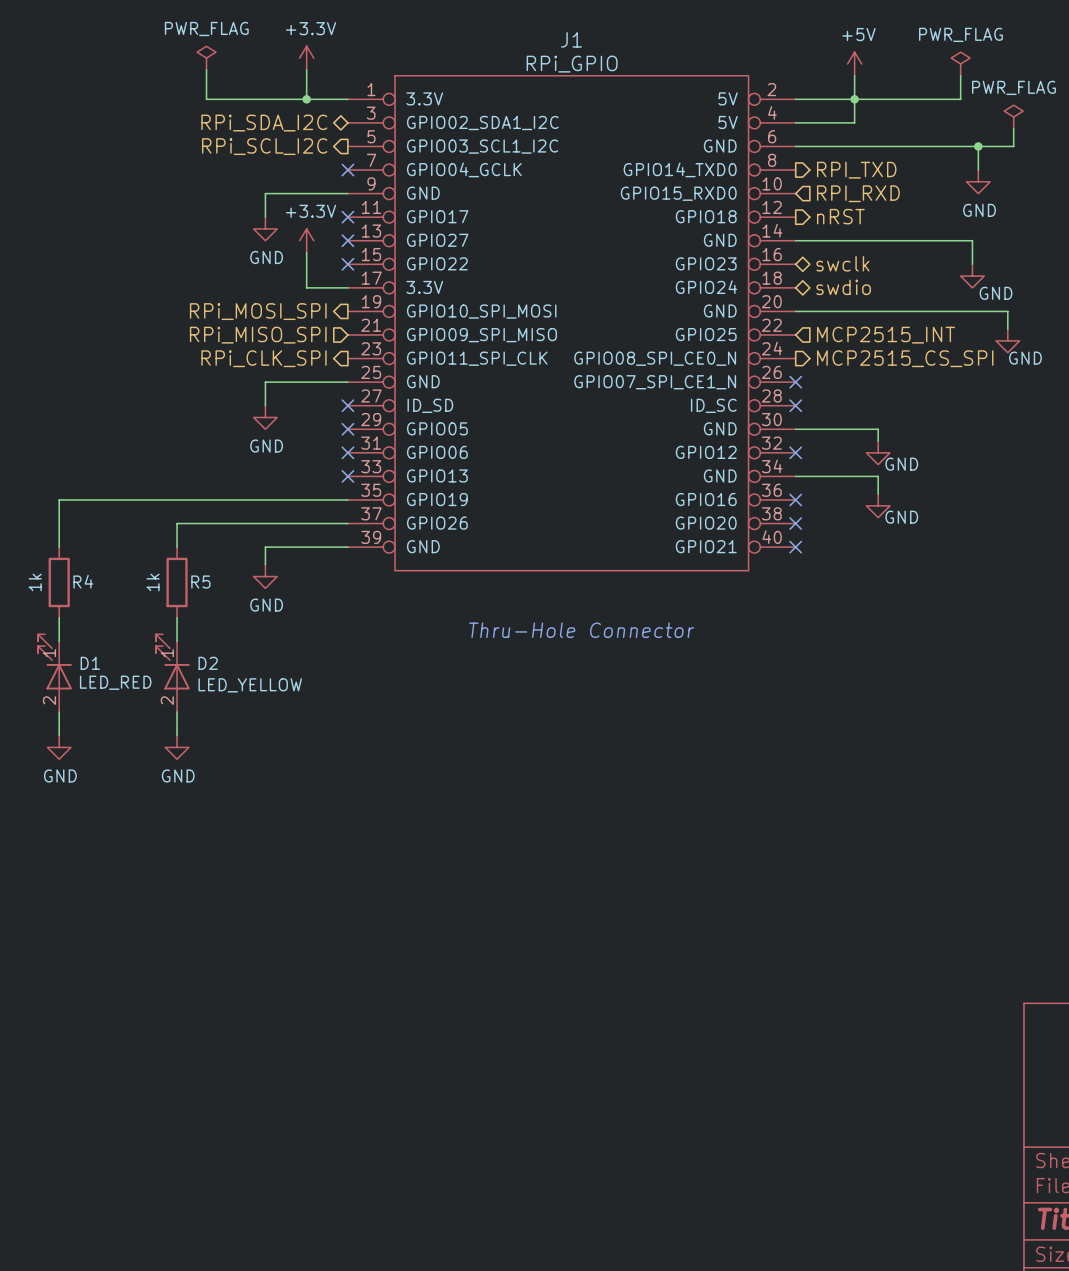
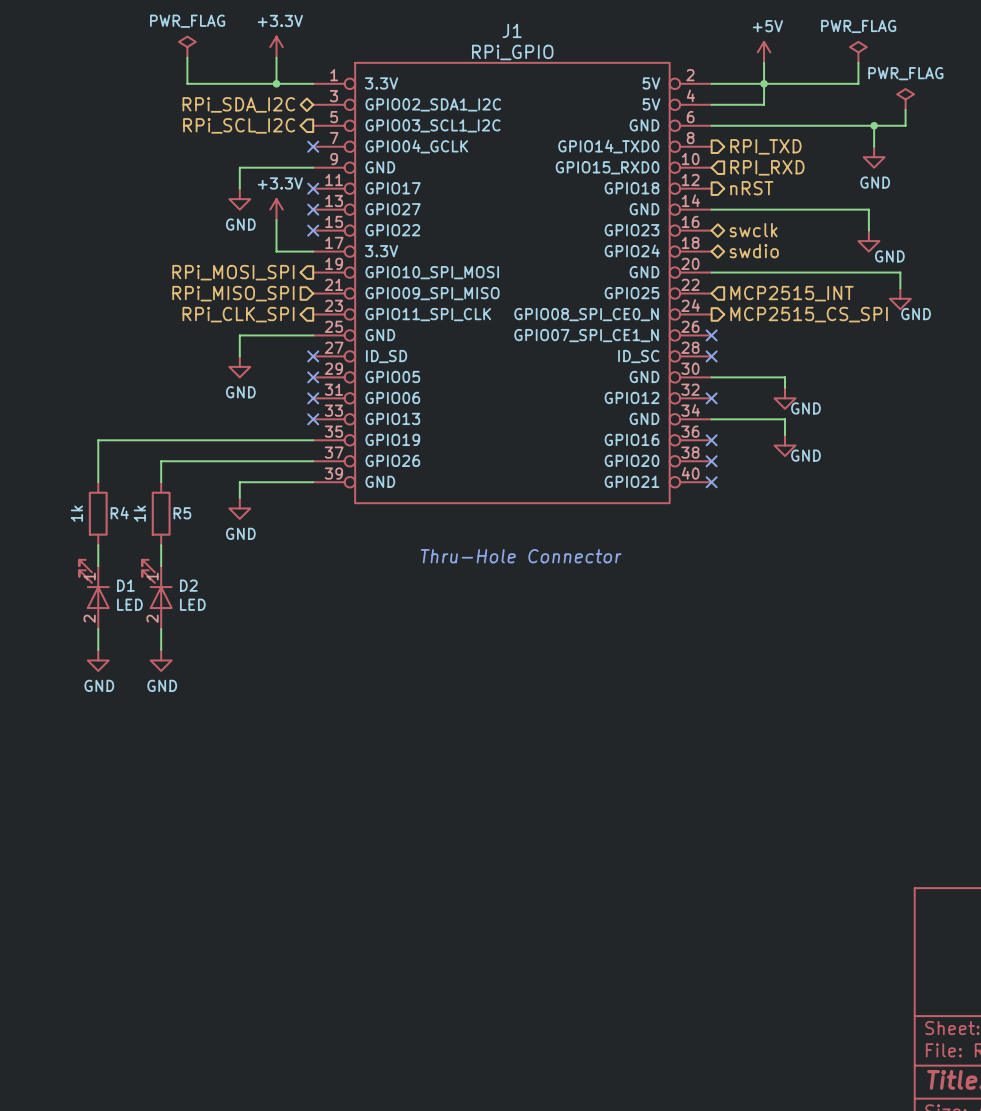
wire: (106, 499) (59, 499) (59, 547) -> (98, 440) (98, 482)
R4 position: (59, 582) -> (98, 513)
wire: (59, 617) (59, 641) -> (98, 545) (98, 566)
D1 position: (54, 673) -> (94, 594)
D1 value: LED_RED (115, 682) -> LED (129, 604)
D2 value: LED_YELLOW (250, 685) -> LED (192, 604)
wire: (59, 712) (59, 735) -> (98, 629) (98, 649)
power symbol position: GND (59, 747) -> GND (98, 660)

